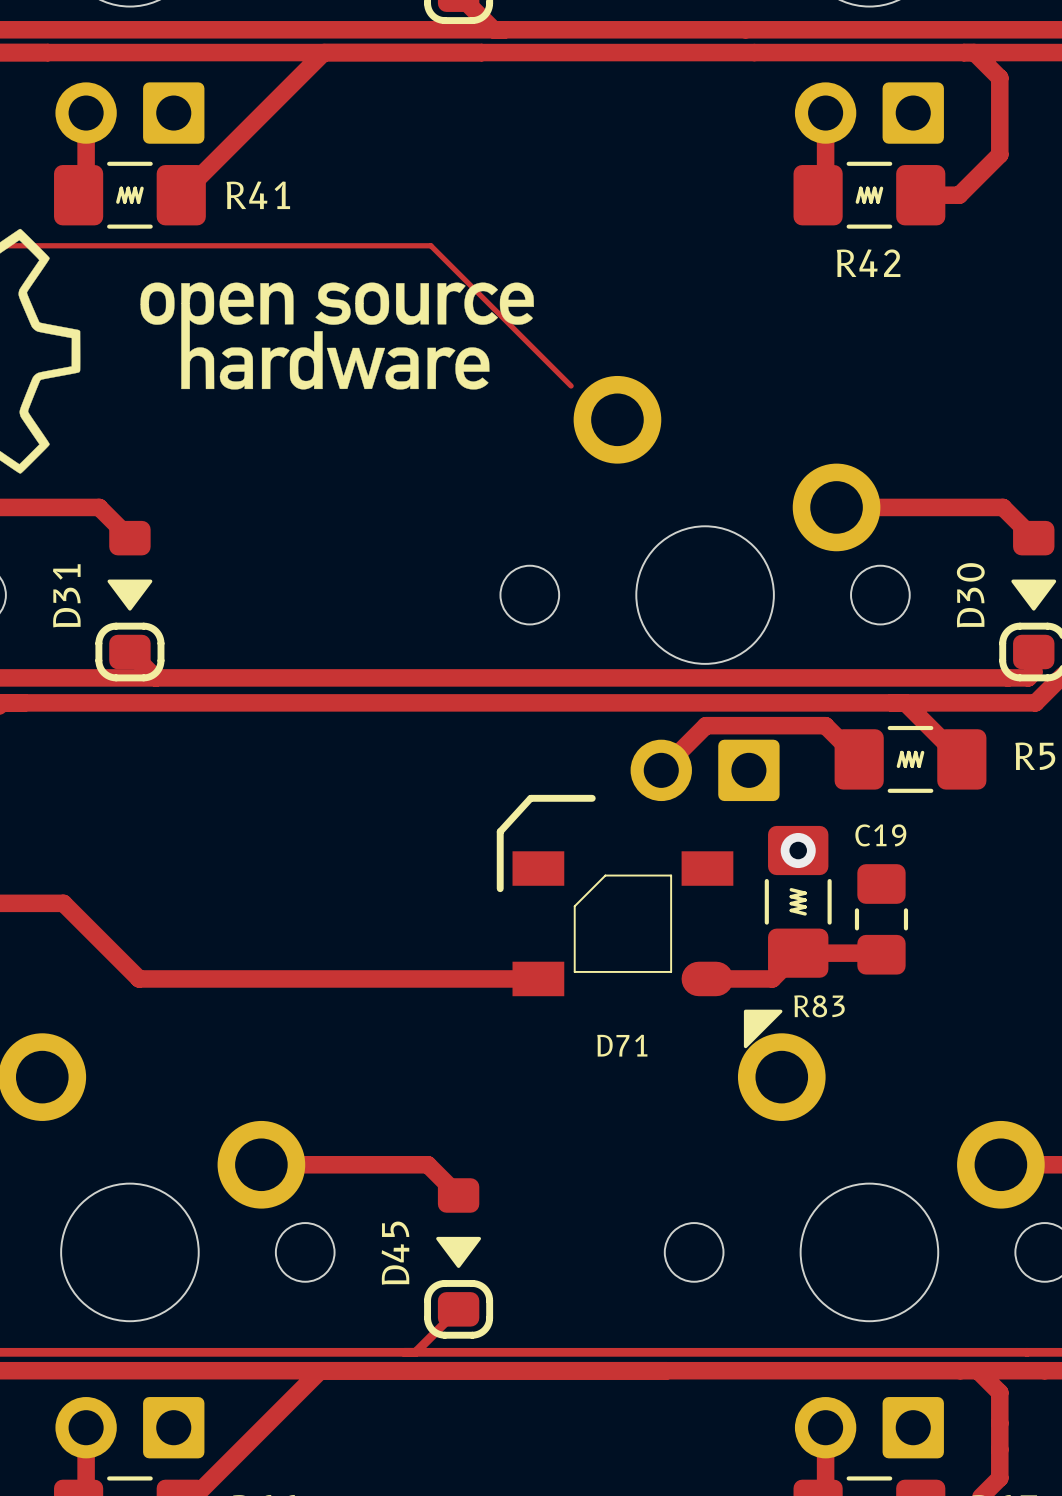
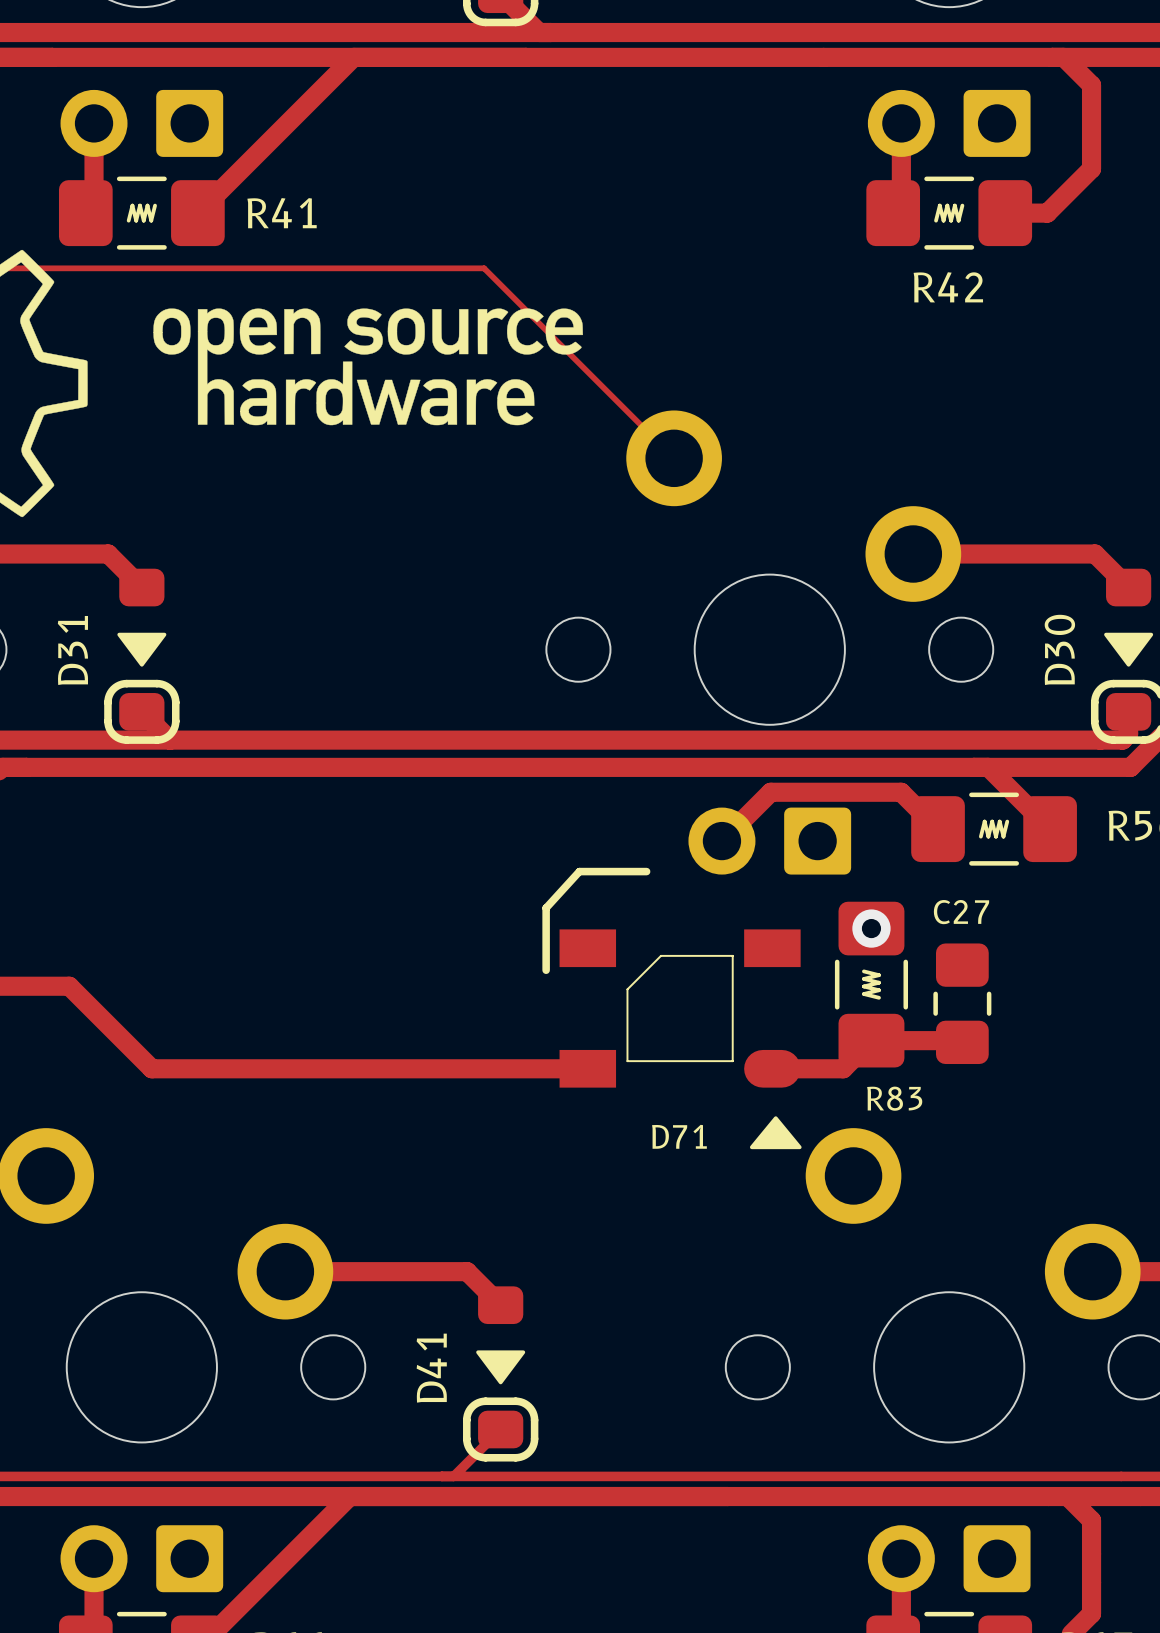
track: (430, 245) (571, 386) -> (470, 268) (484, 268) (674, 458)
D71 footprint: [496, 794, 783, 1049] -> [542, 867, 802, 1150]
C19 name: C19 (880, 835) -> C27 (961, 912)
D45 name: D45 (395, 1253) -> D41 (431, 1368)

